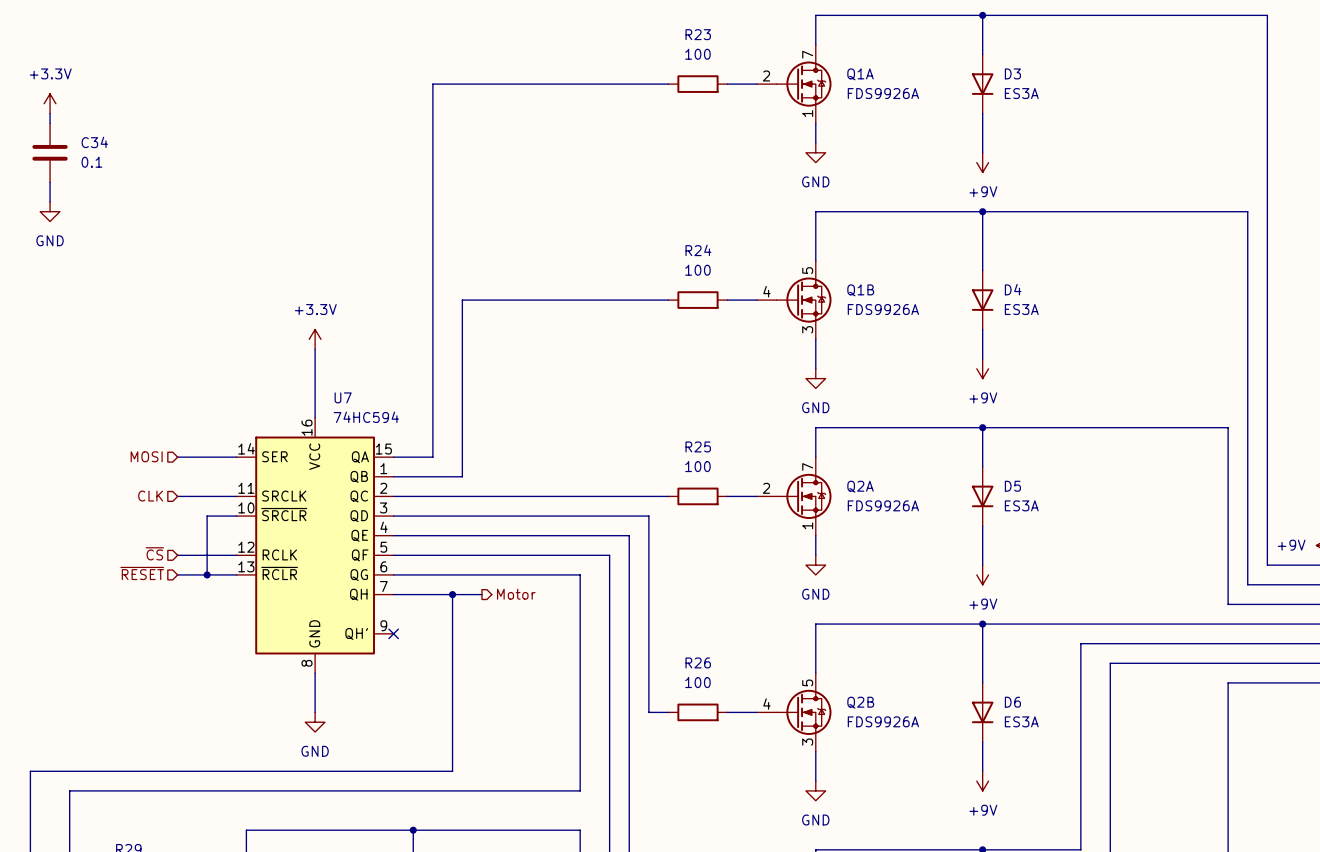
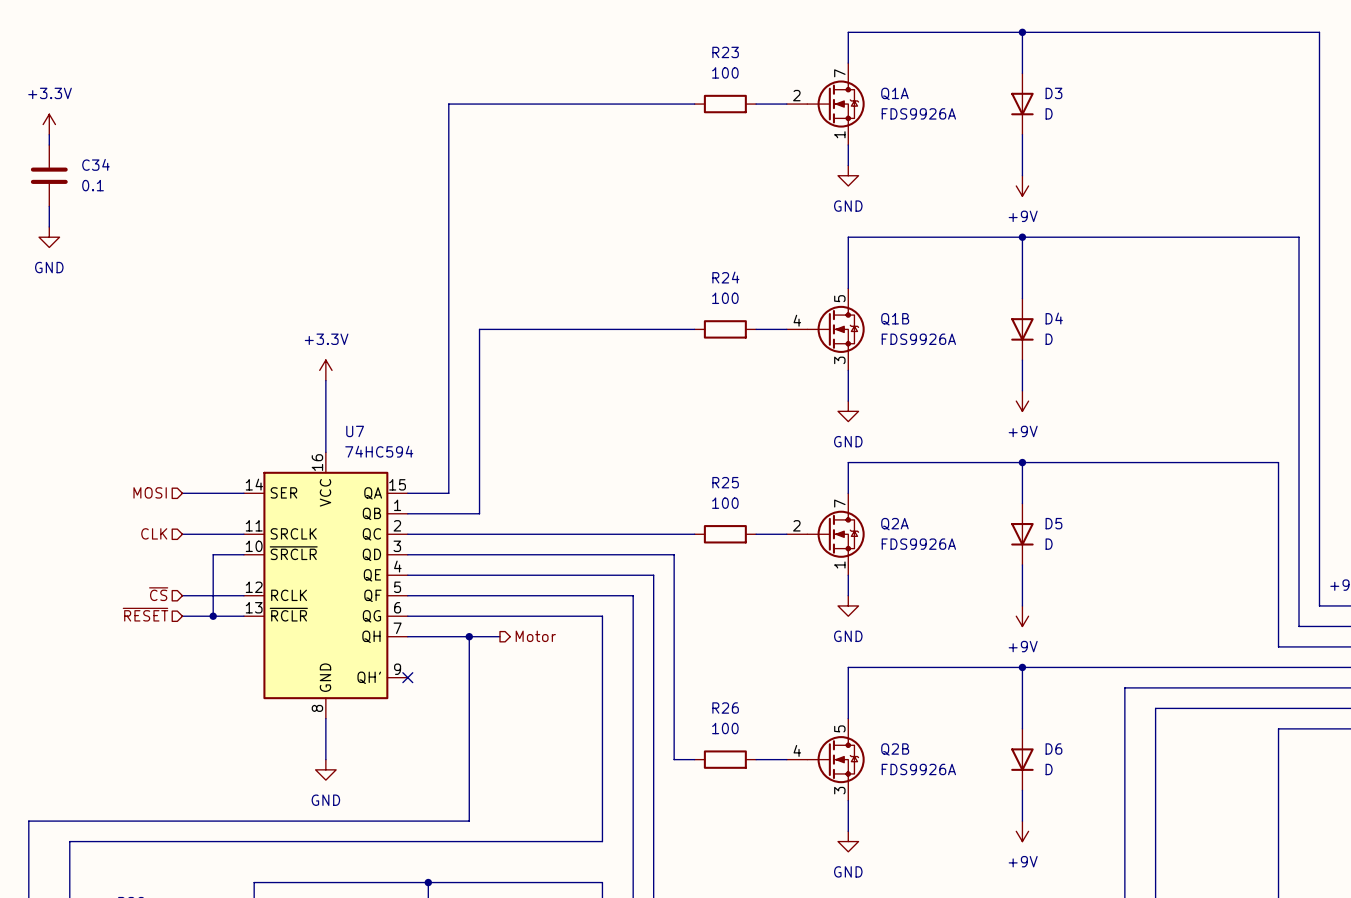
D3 value: ES3A (1021, 93) -> D (1049, 113)
D4 value: ES3A (1021, 309) -> D (1049, 339)
D5 value: ES3A (1021, 505) -> D (1049, 544)
D6 value: ES3A (1021, 721) -> D (1049, 769)

